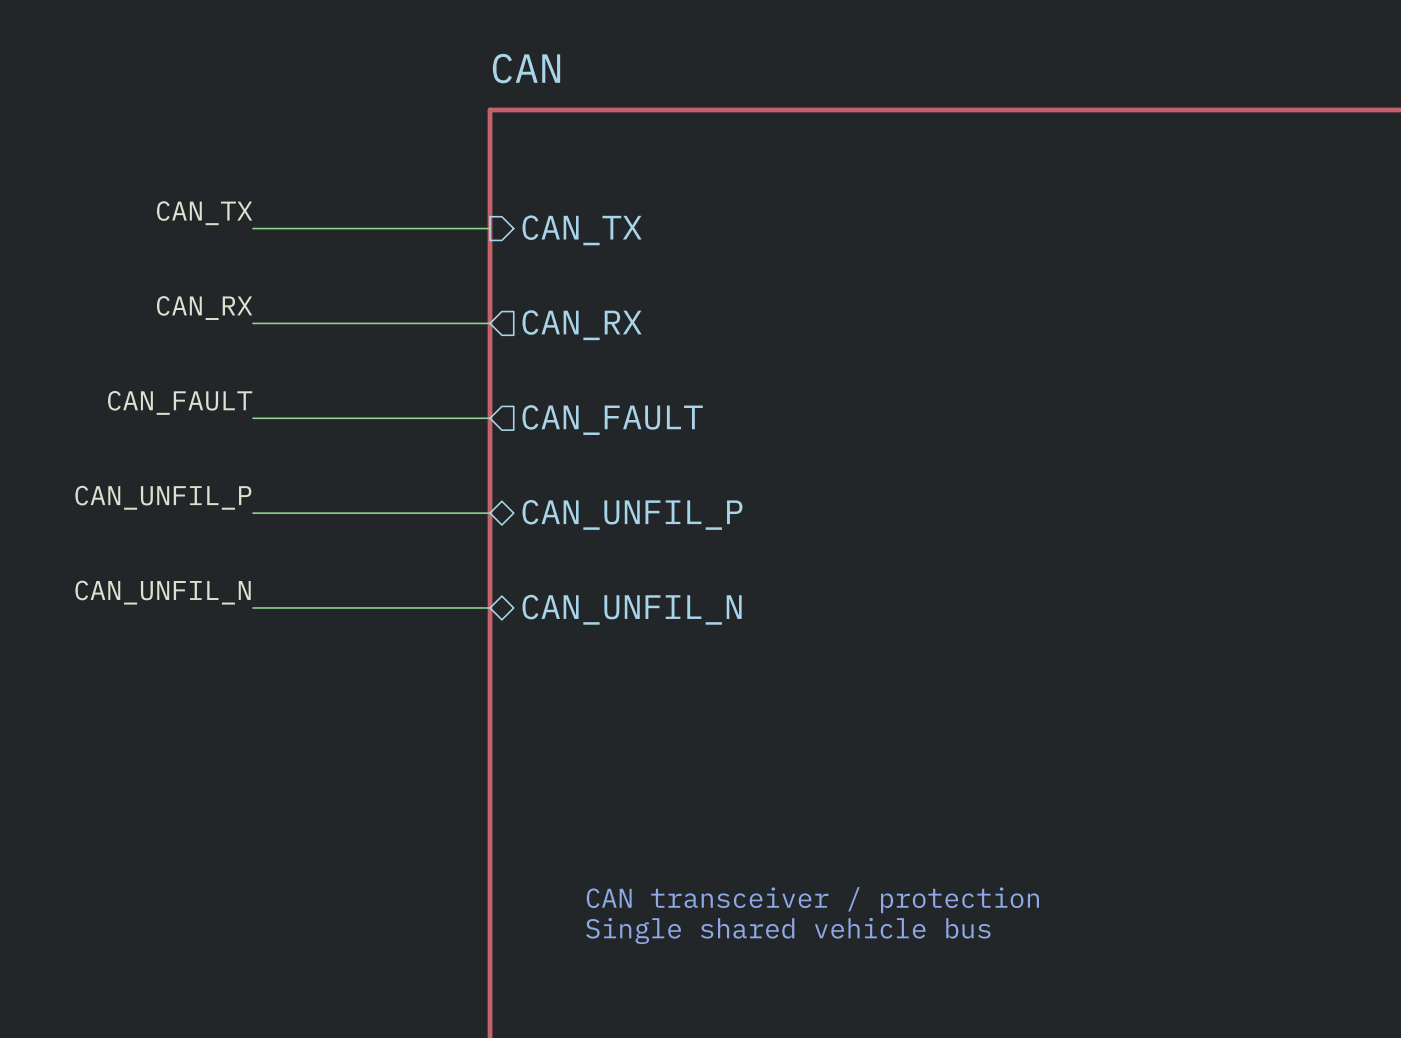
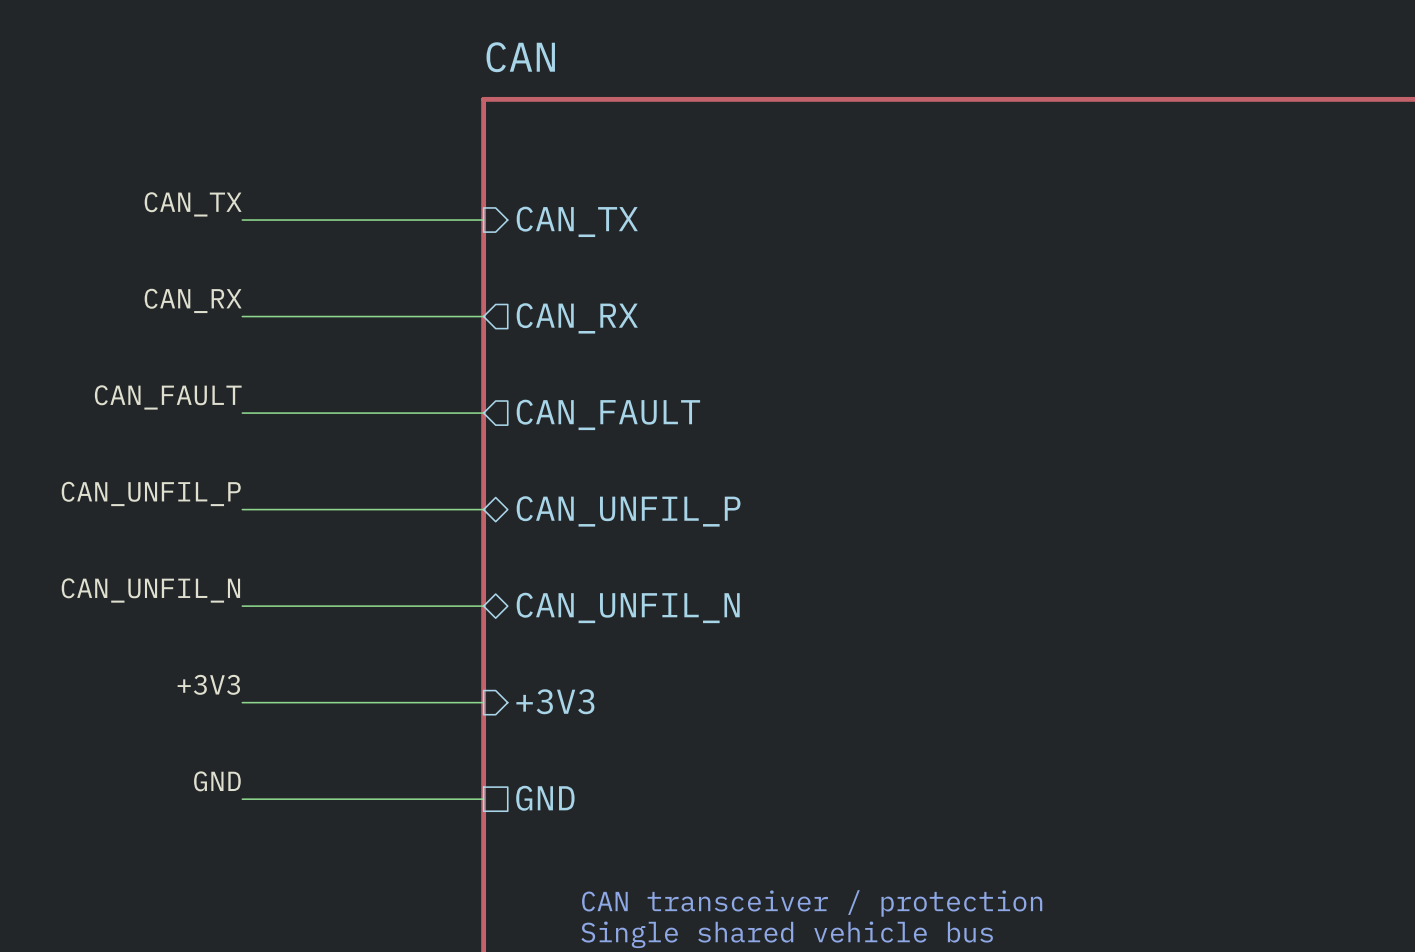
label: none -> +3V3 (208, 684)
sheet pin: none -> +3V3 (555, 701)
wire: none -> (242, 702) (483, 702)
label: none -> GND (217, 781)
sheet pin: none -> GND (545, 798)
wire: none -> (242, 799) (483, 799)

